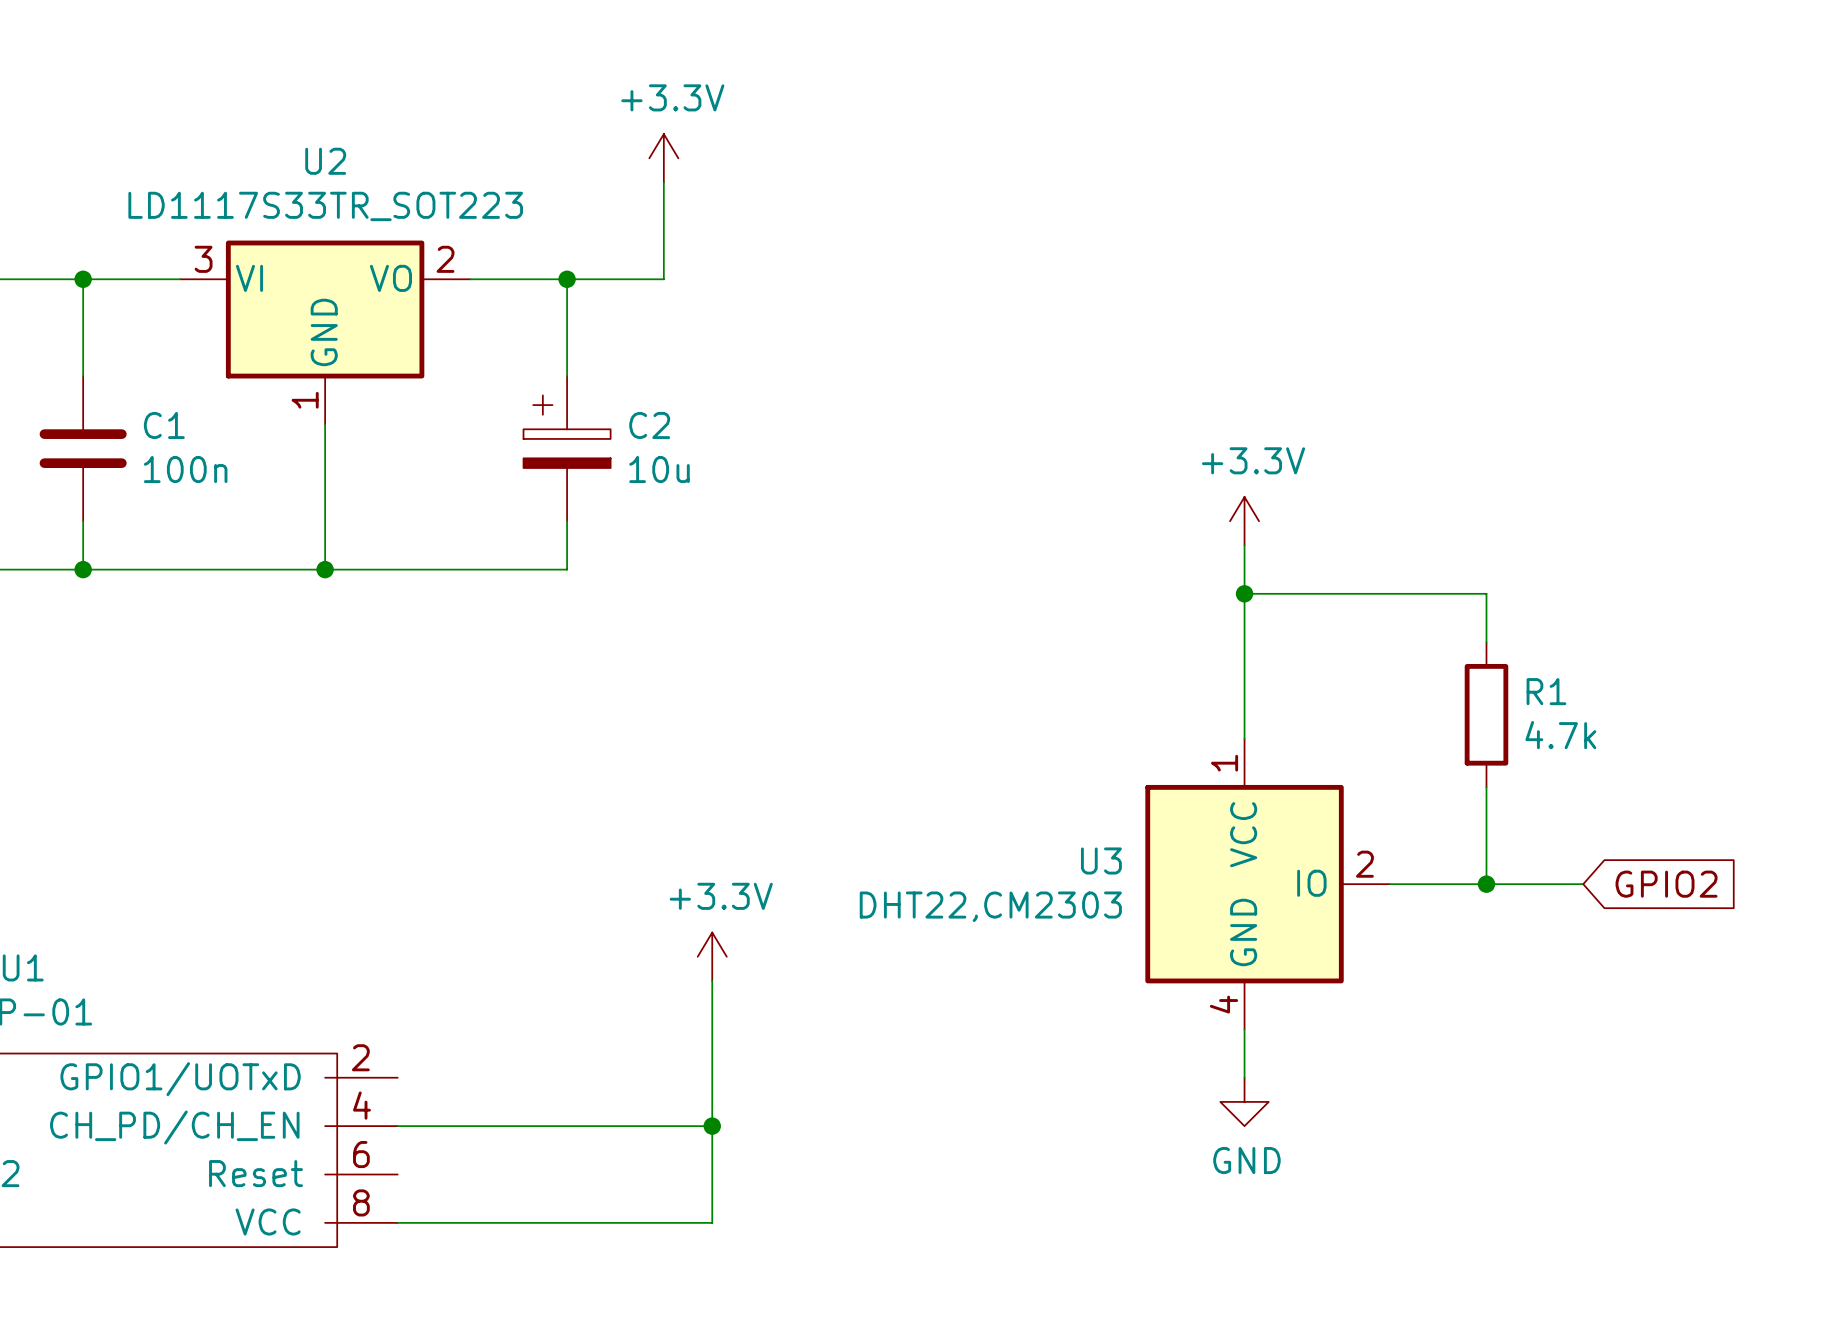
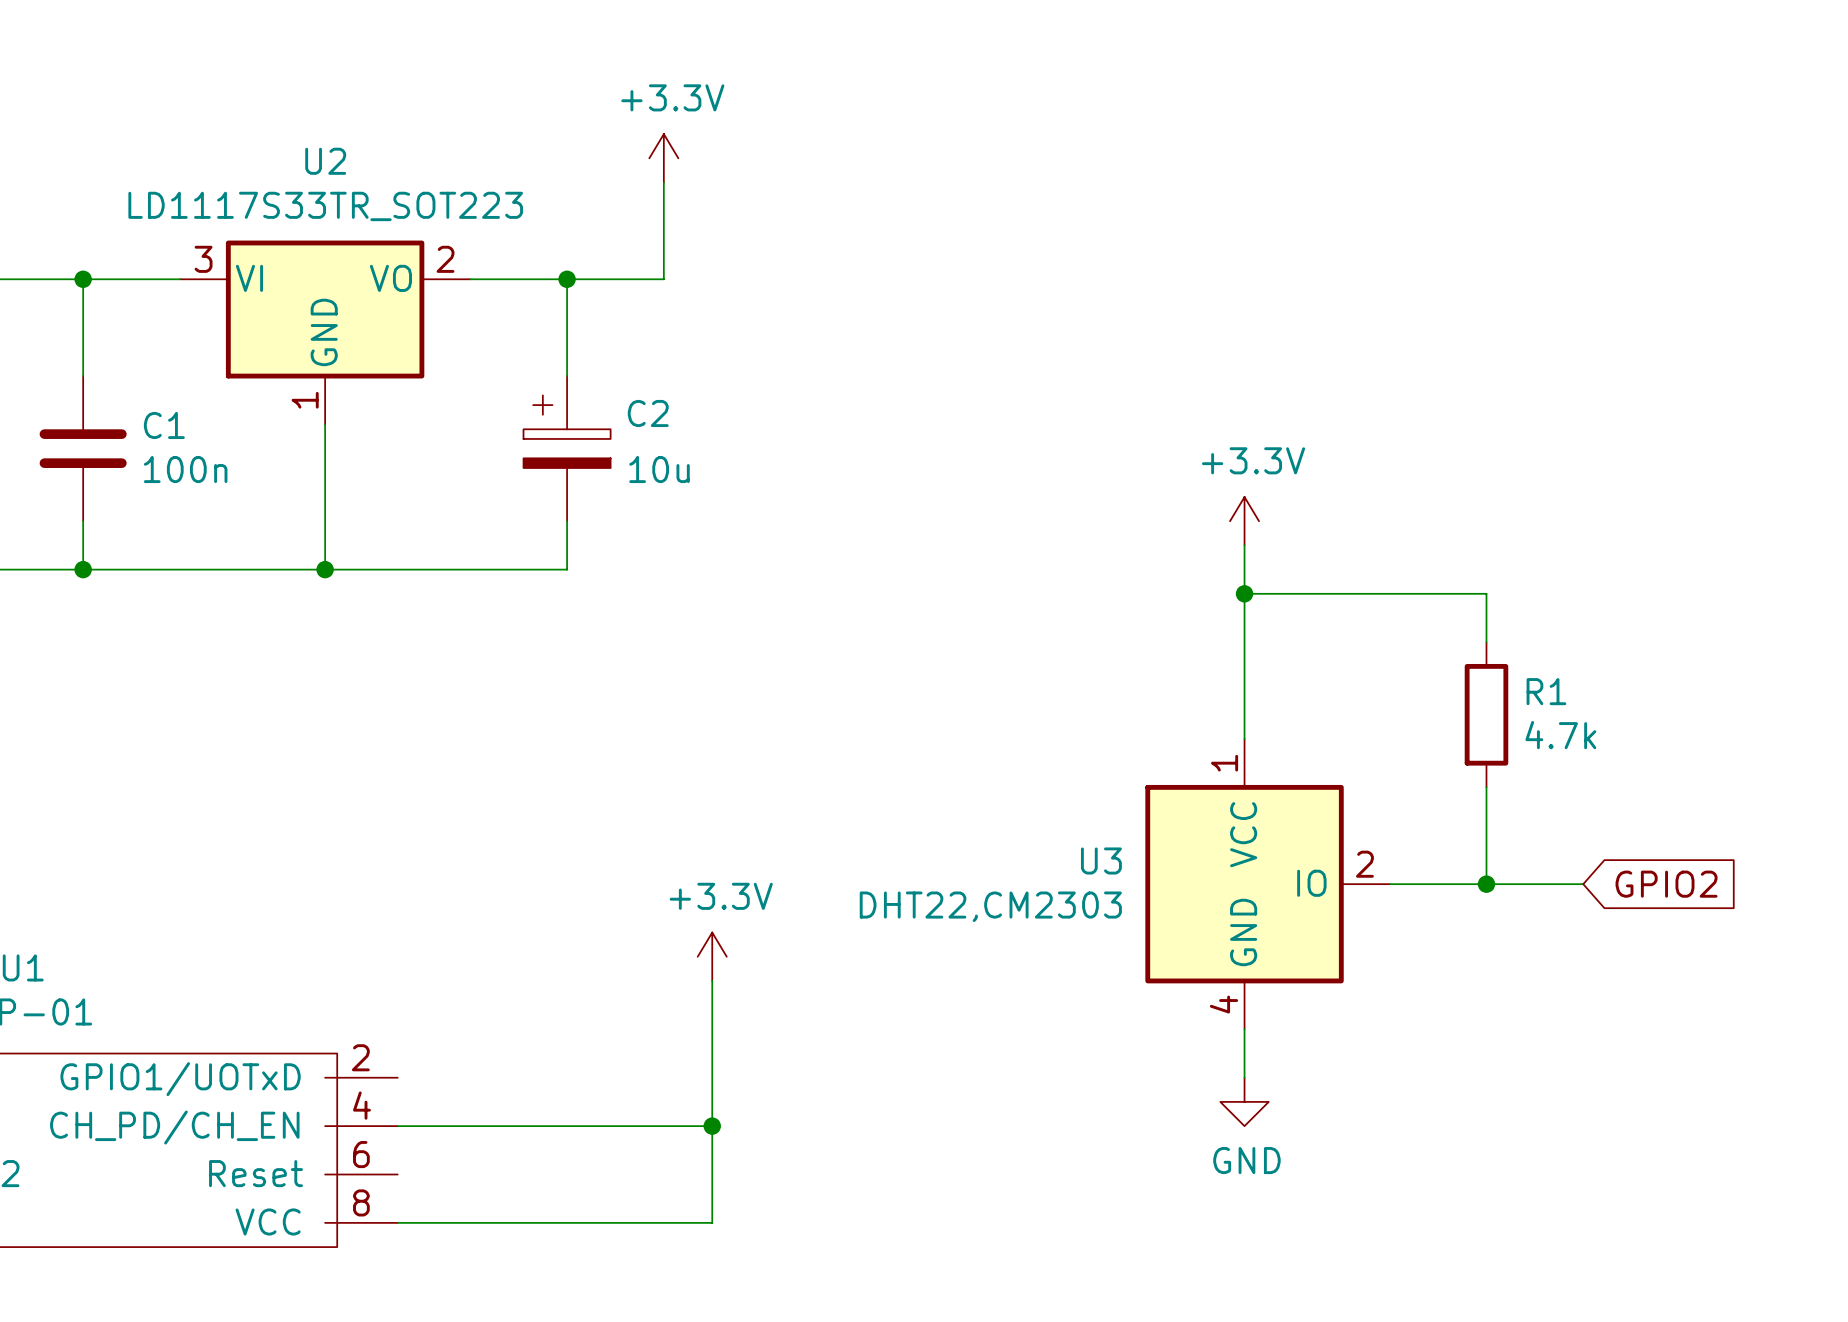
C2 name position: C2 (649, 425) -> C2 (648, 413)

